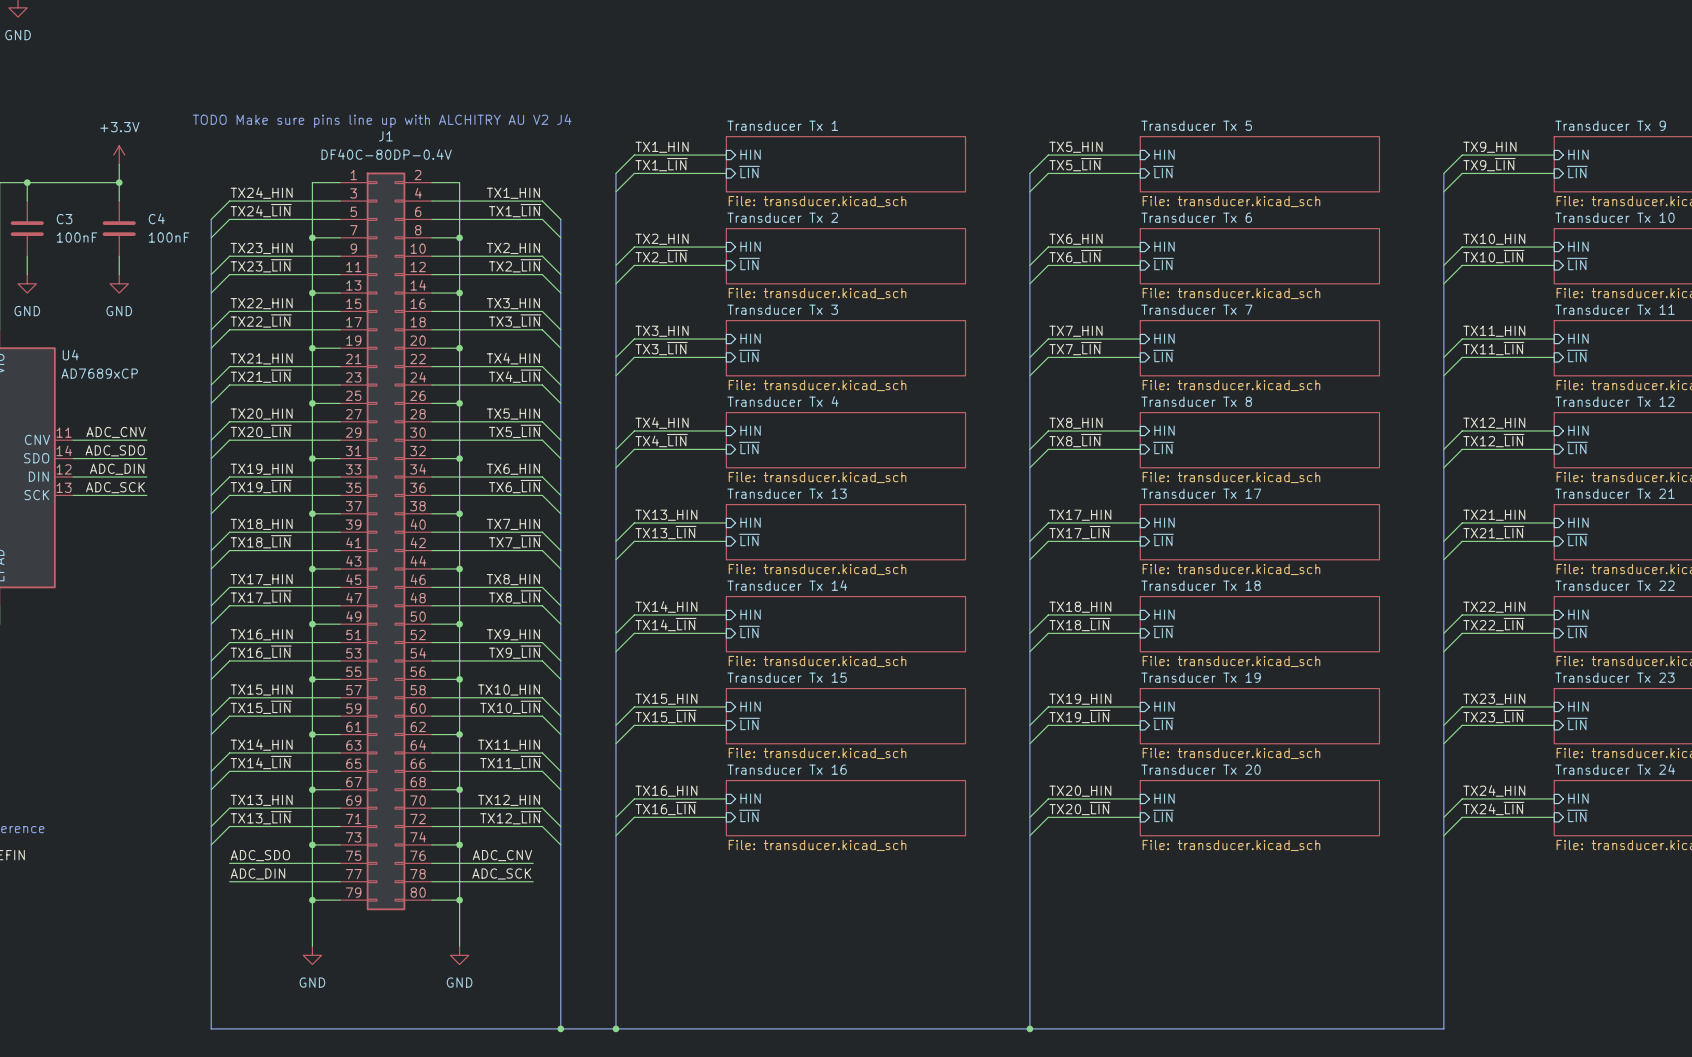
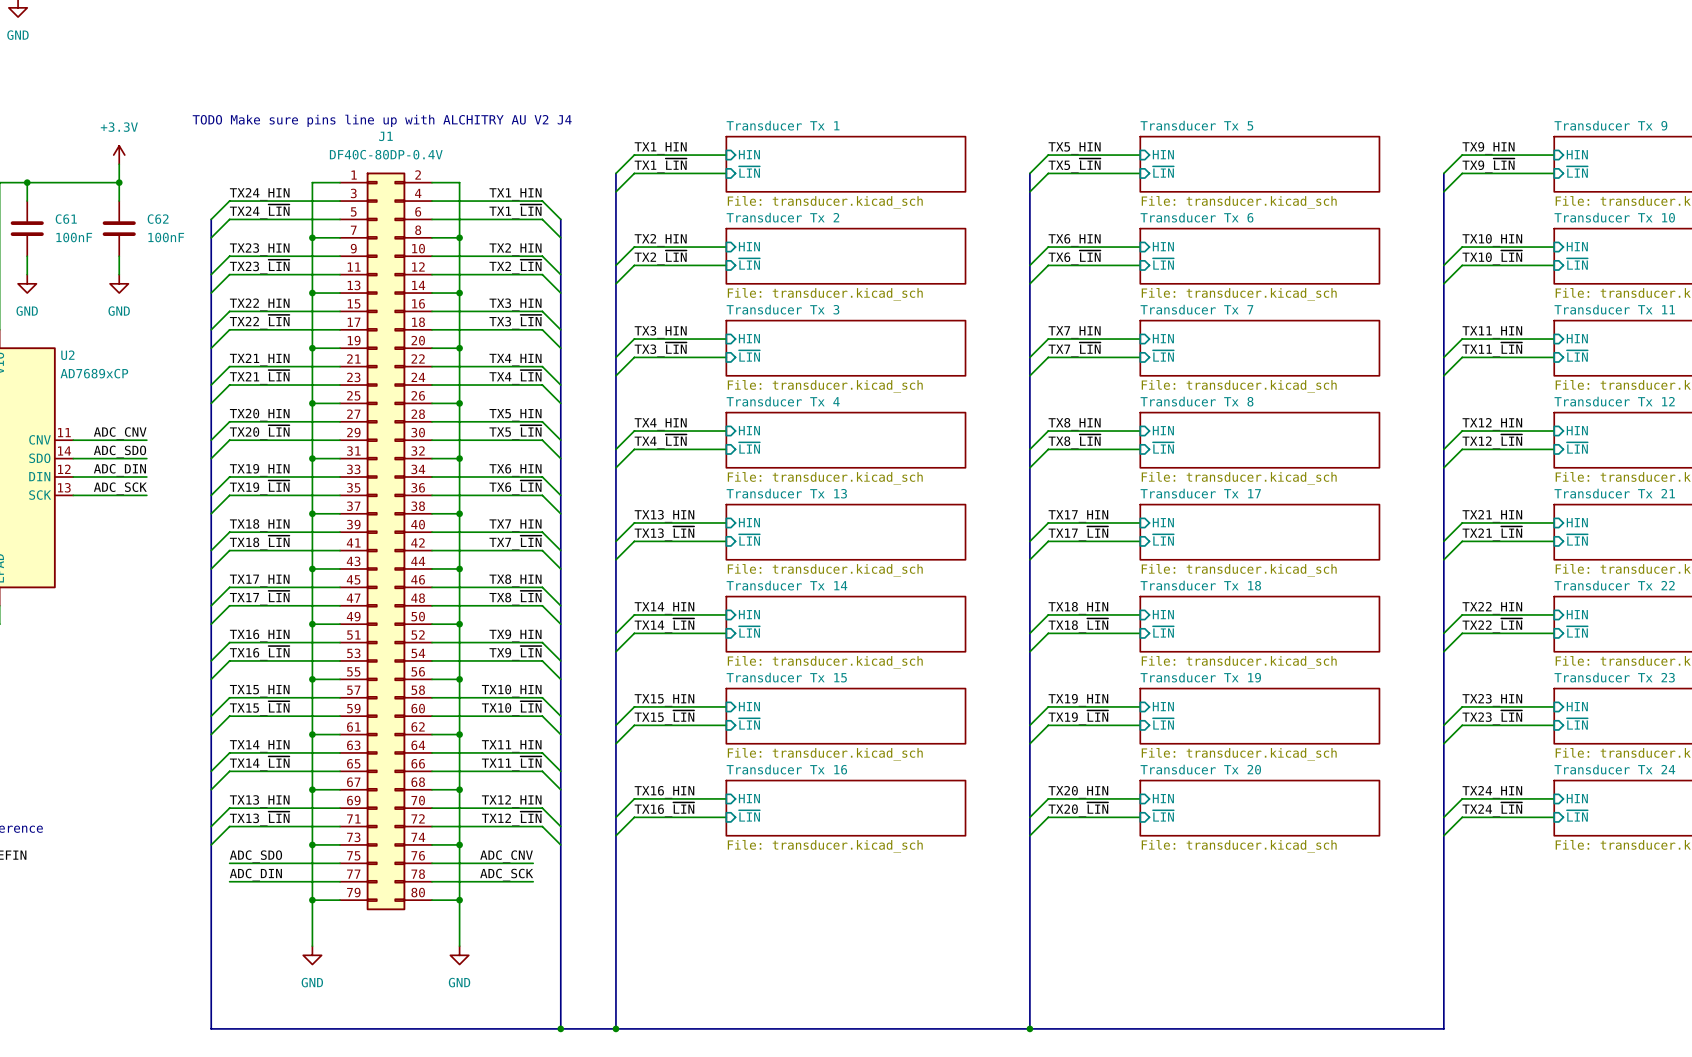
C4 name: C4 (156, 218) -> C62 (158, 219)
C3 name: C3 (64, 219) -> C61 (66, 219)
U4 name: U4 (70, 355) -> U2 (67, 355)

